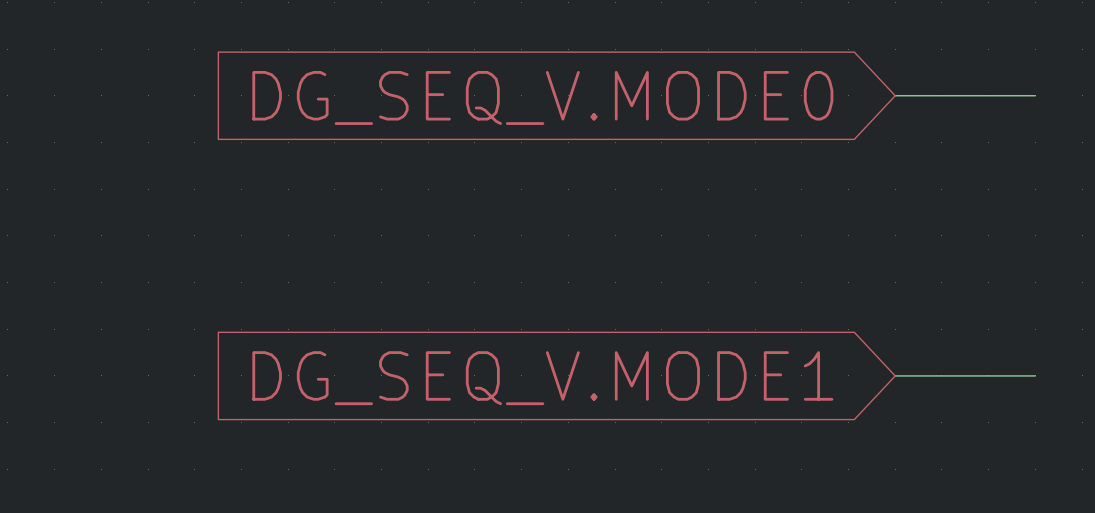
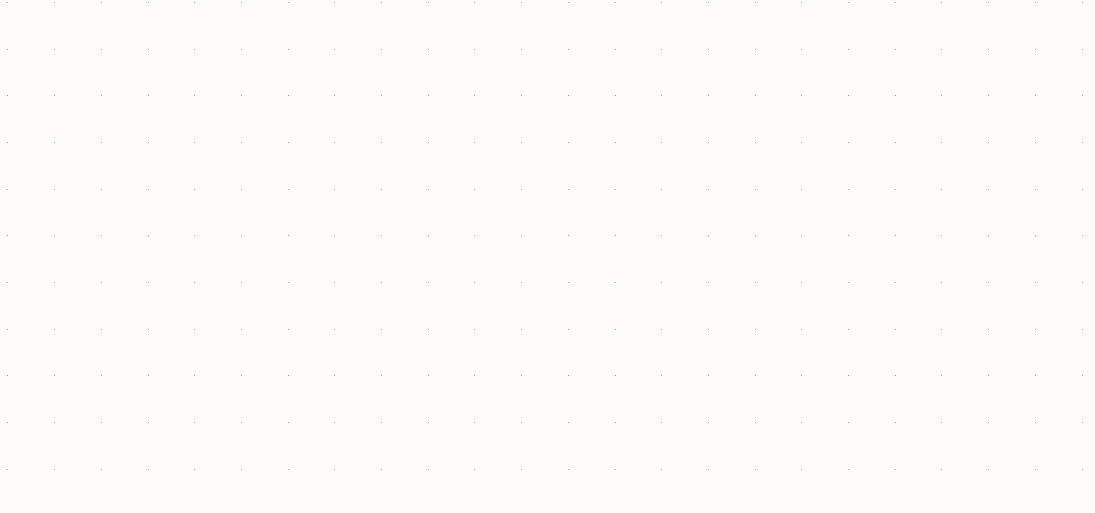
wire: (895, 95) (1035, 95) -> none
global label: DG_SEQ_V.MODE0 (542, 97) -> none
wire: (895, 375) (1035, 375) -> none
global label: DG_SEQ_V.MODE1 (542, 378) -> none

